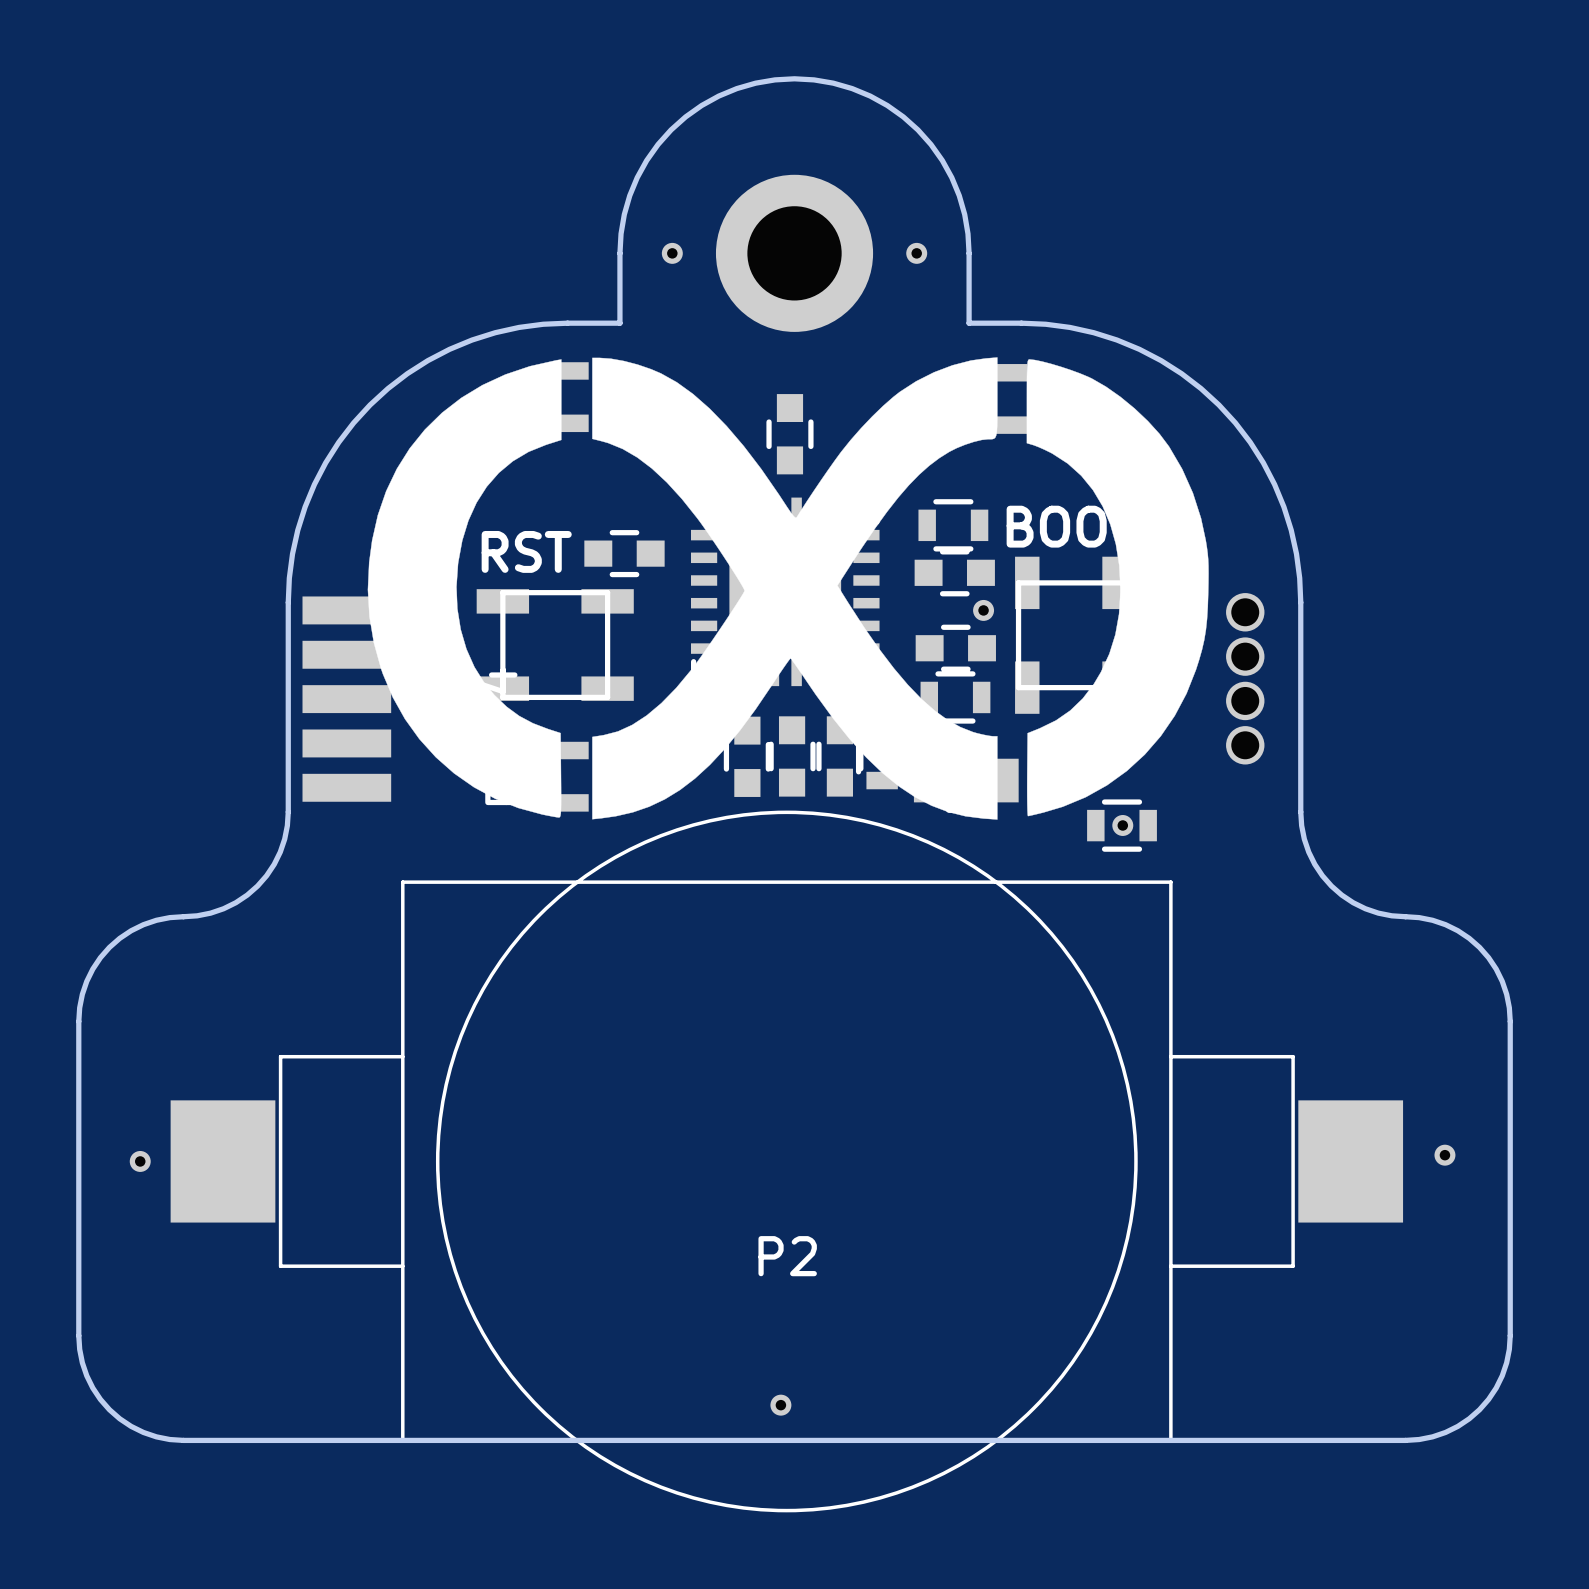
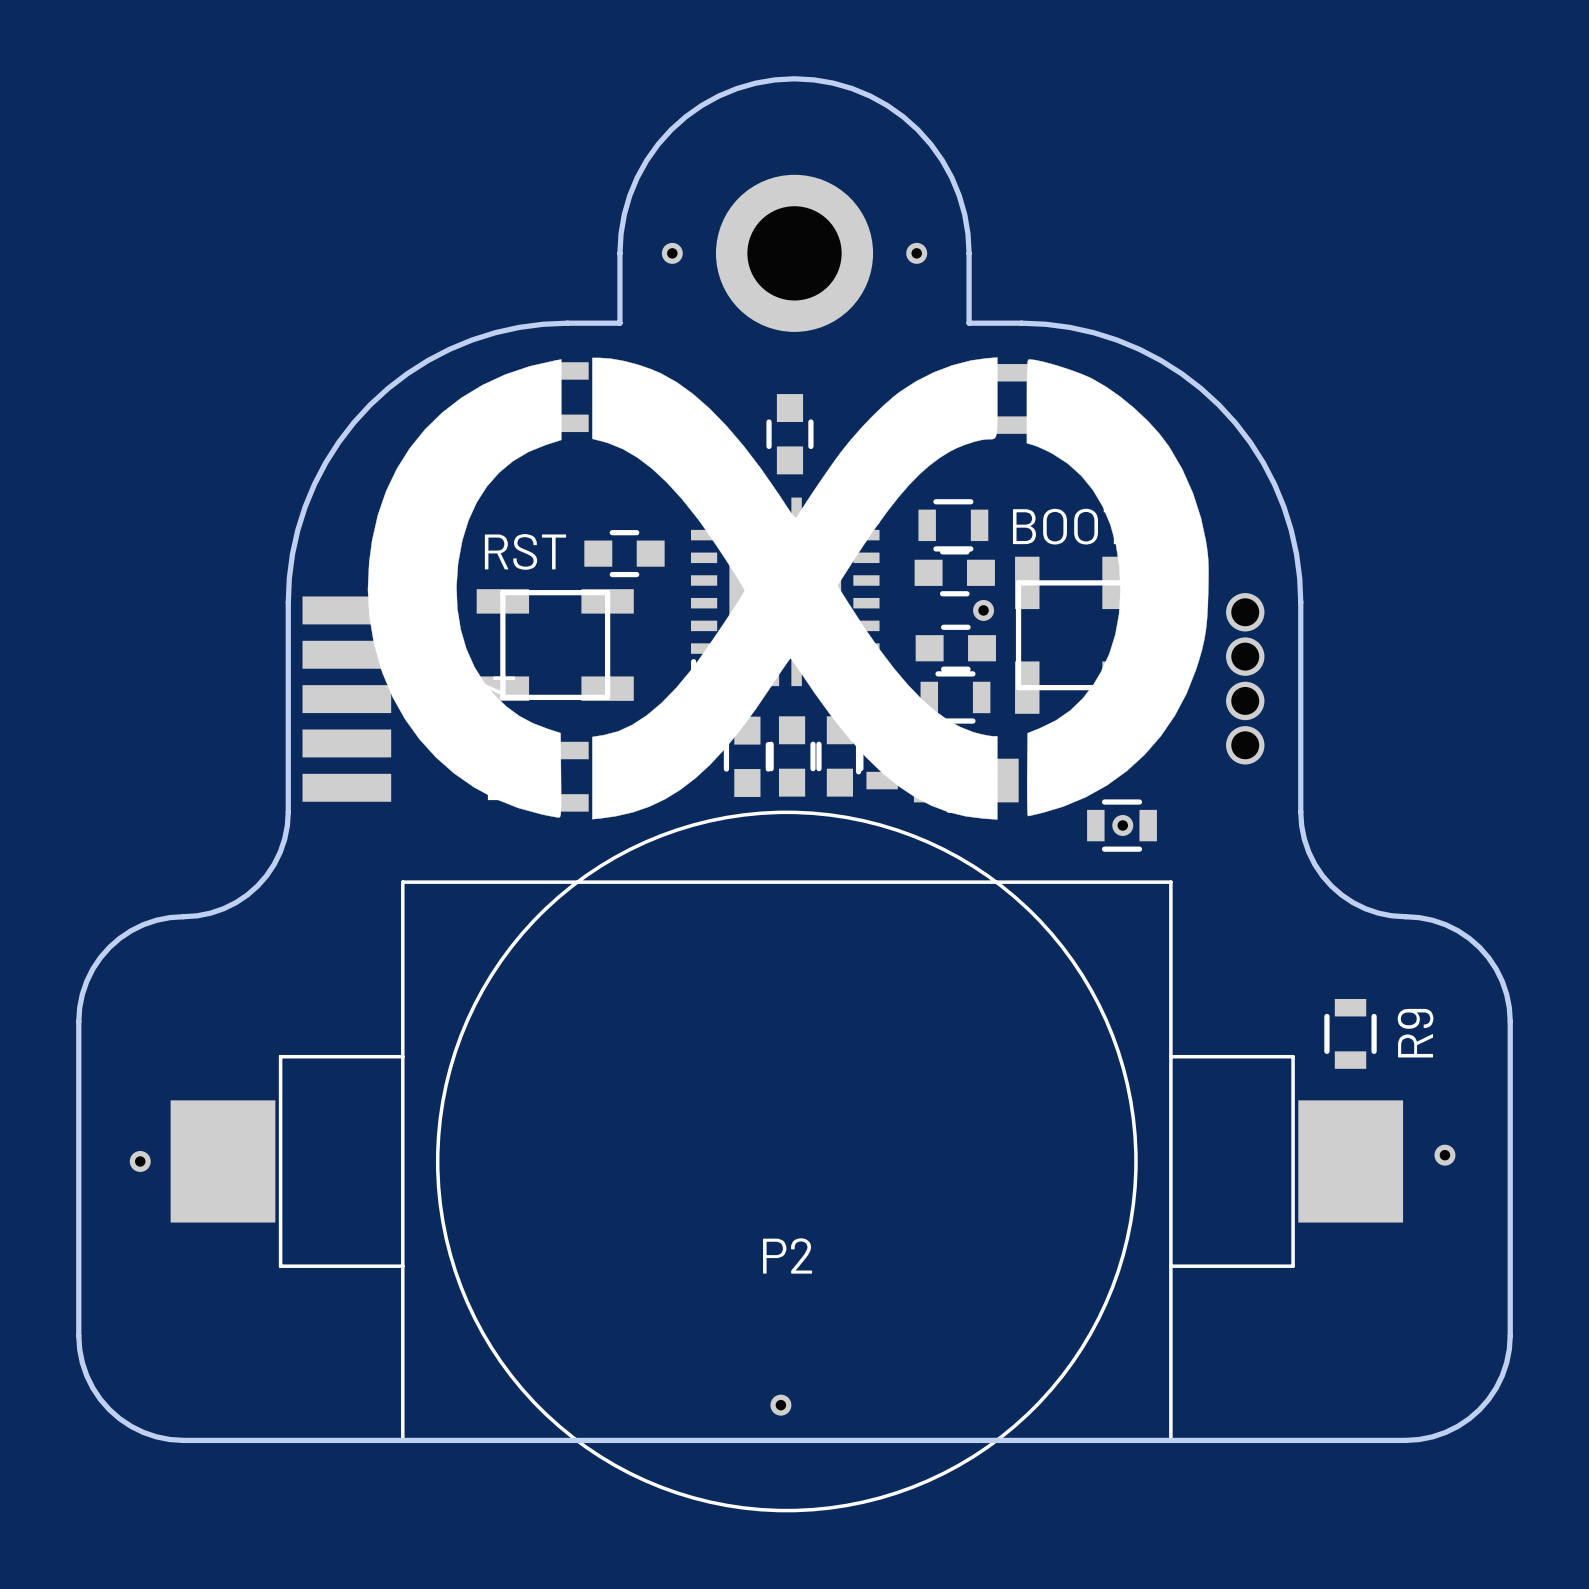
R9: none -> (1350, 1033)

